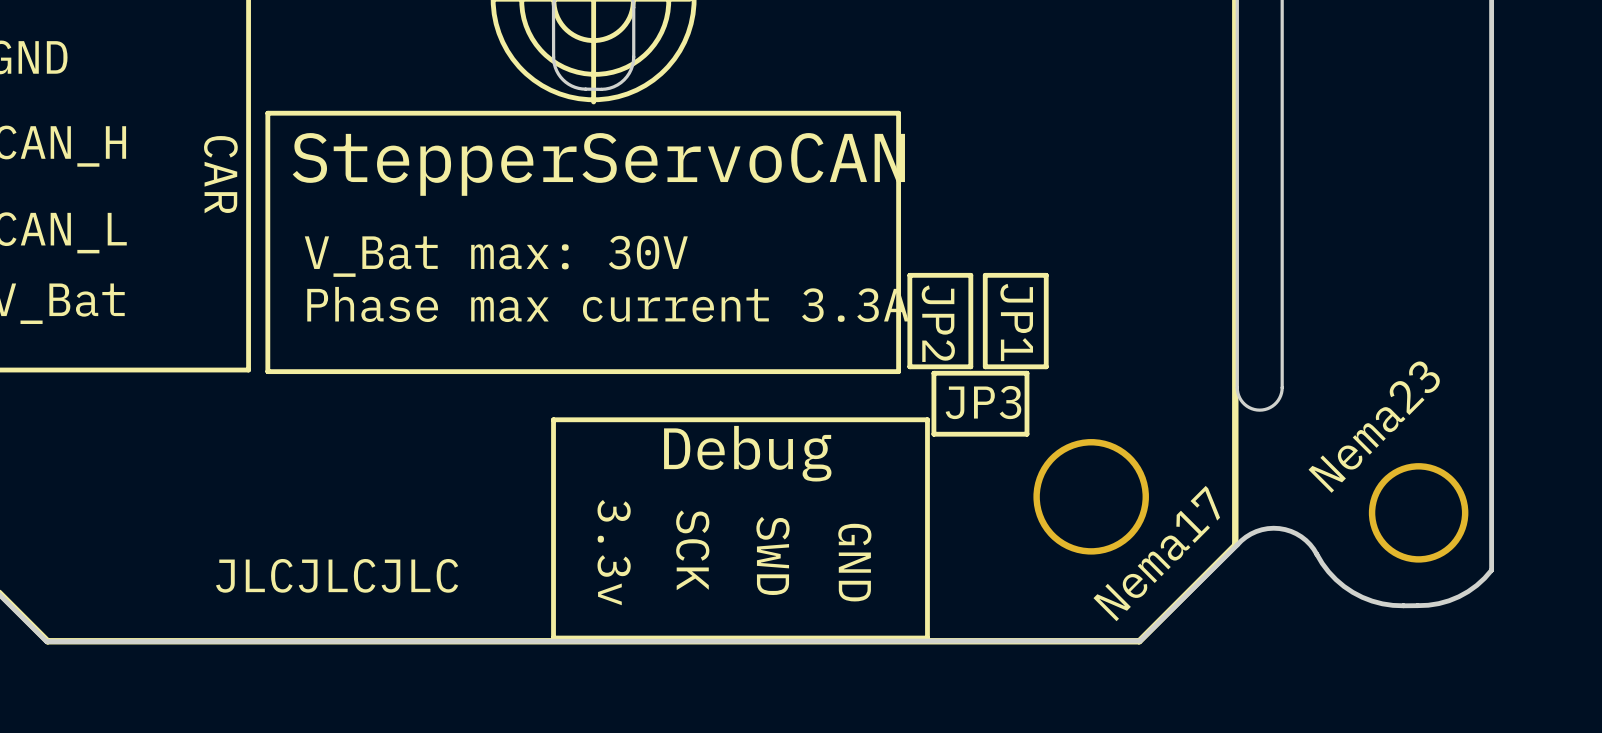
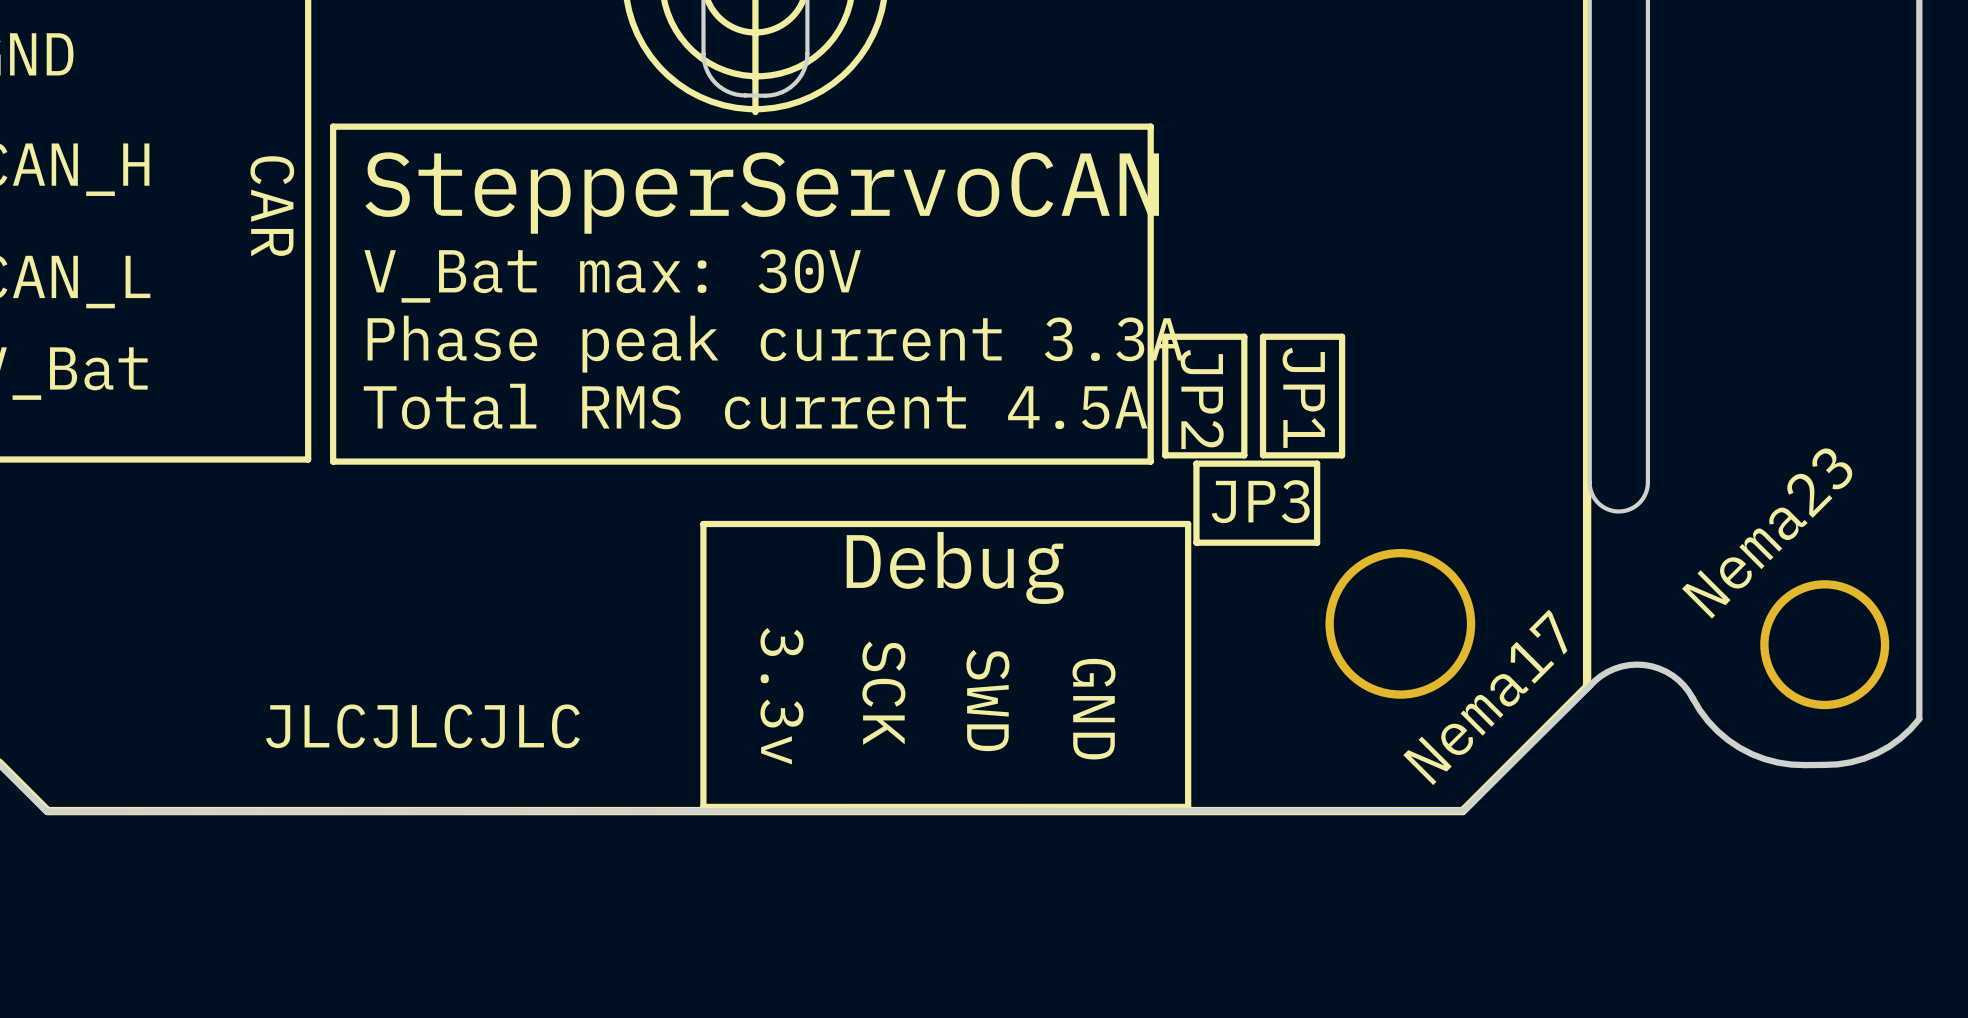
text position: V_Bat max: 30V (496, 256) -> V_Bat max: 30V (612, 276)
text: Phase max current 3.3A (608, 304) -> Phase peak current 3.3A (775, 344)
text: none -> Total RMS current 4.5A (755, 406)

